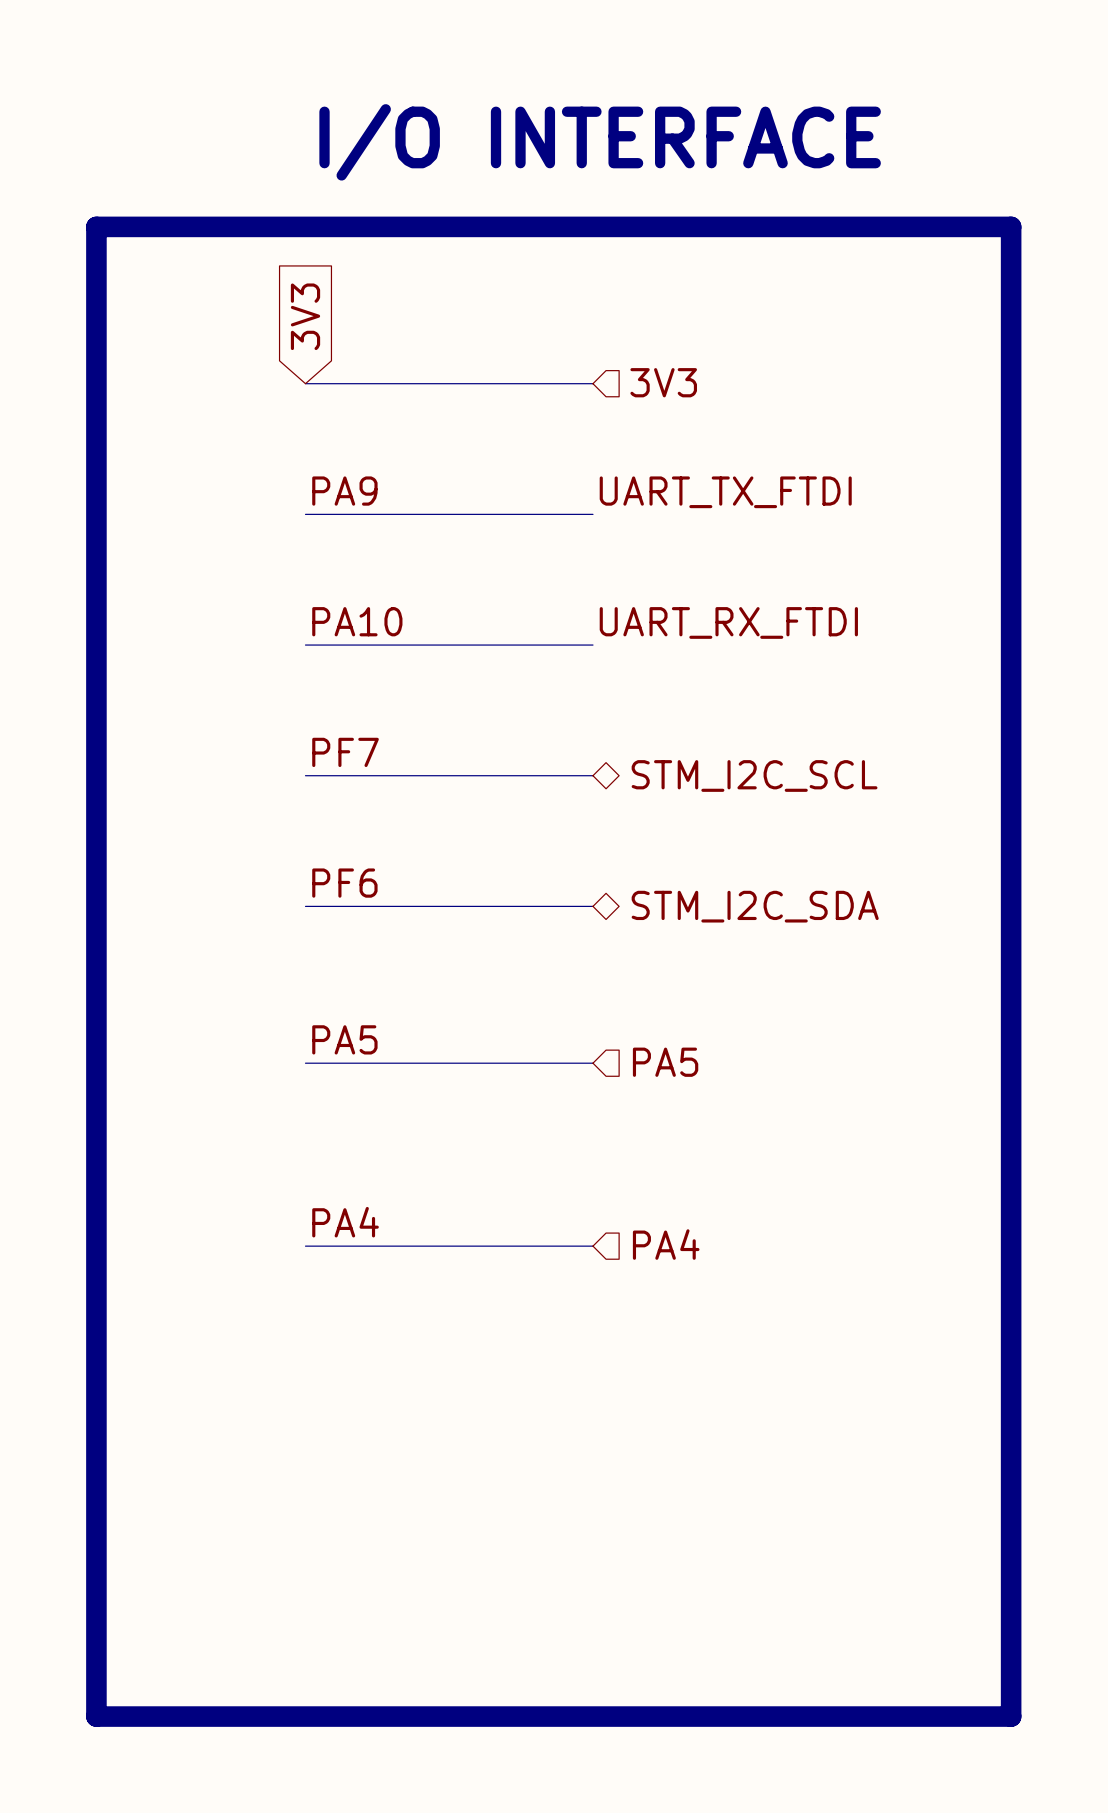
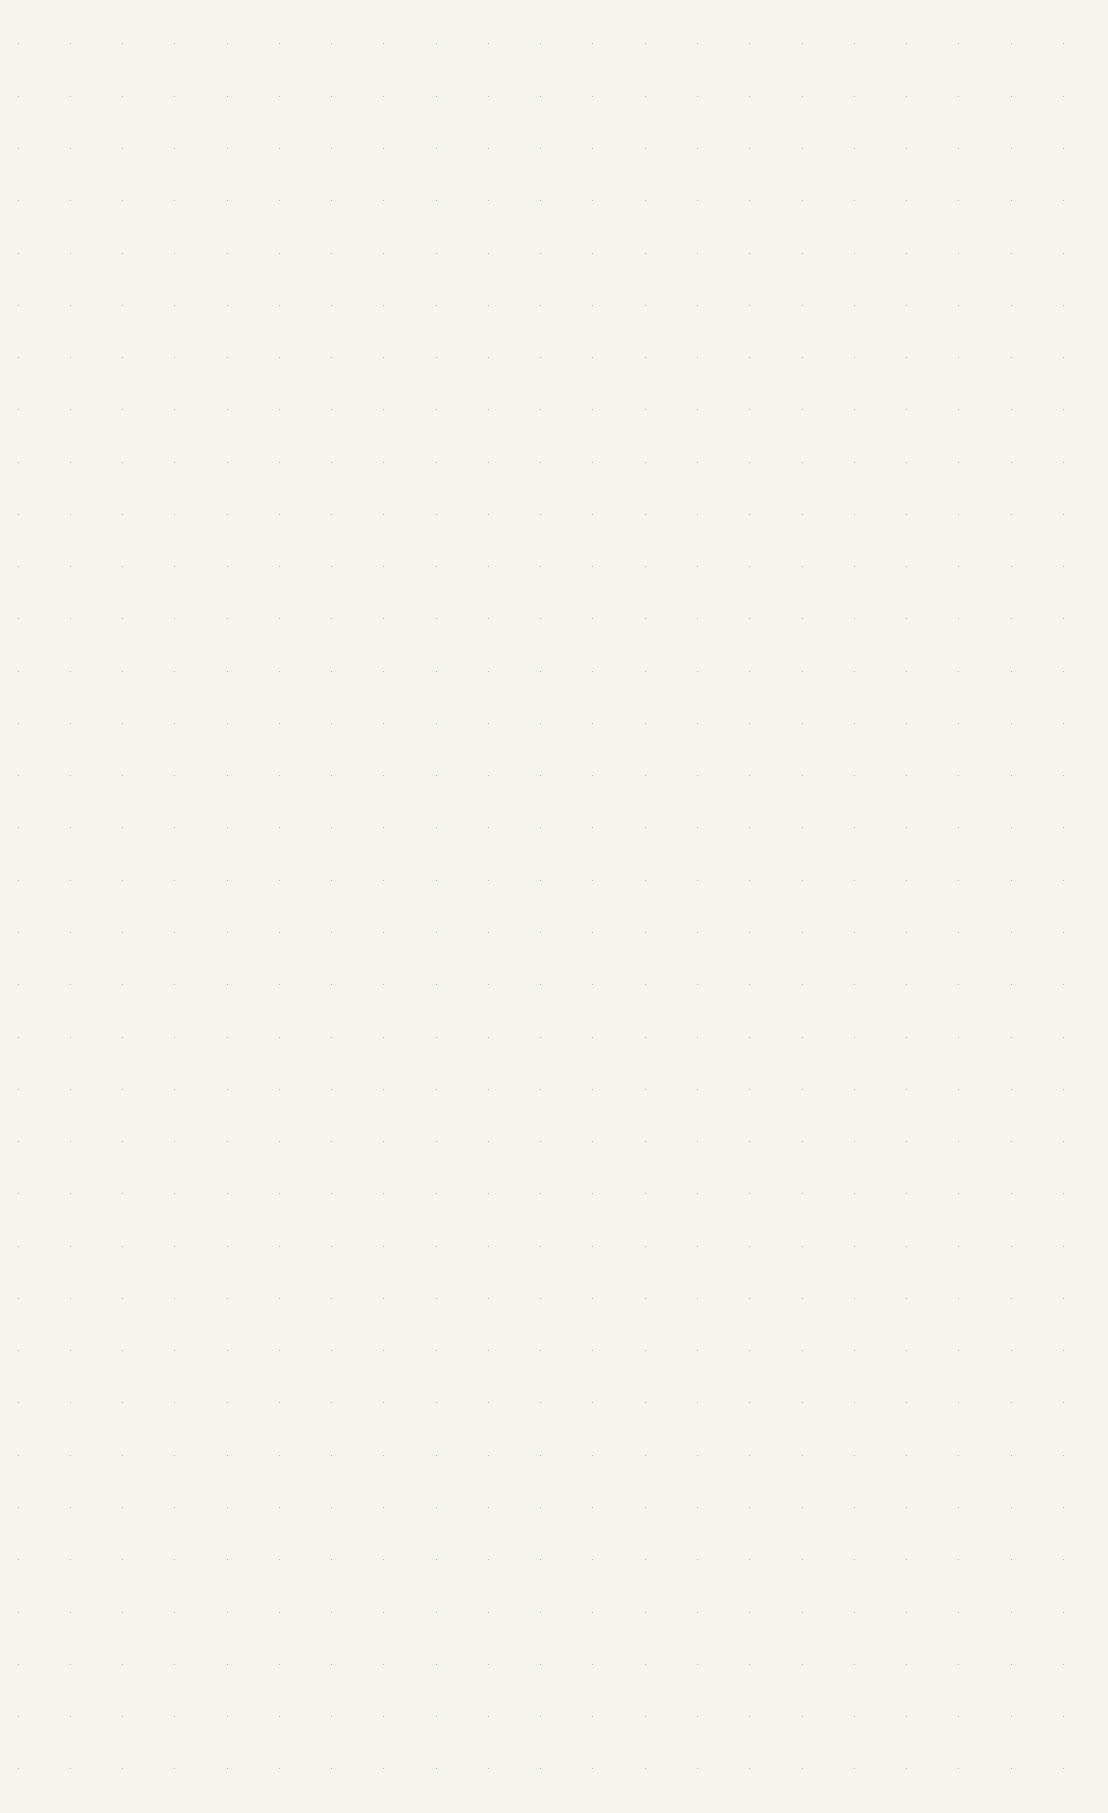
text: I/O INTERFACE (600, 142) -> none
line: (96, 226) (1011, 226) (1011, 1716) (96, 1716) (96, 226) -> none
global label: 3V3 (305, 316) -> none
hierarchical label: 3V3 (663, 382) -> none
wire: (305, 383) (592, 383) -> none
label: PA9 (344, 491) -> none
label: UART_TX_FTDI (725, 492) -> none
wire: (305, 514) (592, 514) -> none
label: PA10 (357, 621) -> none
label: UART_RX_FTDI (728, 622) -> none
wire: (305, 645) (592, 645) -> none
label: PF7 (345, 752) -> none
wire: (305, 775) (592, 775) -> none
hierarchical label: STM_I2C_SCL (754, 775) -> none
label: PF6 (344, 883) -> none
wire: (305, 906) (592, 906) -> none
hierarchical label: STM_I2C_SDA (755, 906) -> none
label: PA5 (344, 1039) -> none
hierarchical label: PA5 (665, 1062) -> none
wire: (305, 1063) (592, 1063) -> none
label: PA4 (345, 1222) -> none
hierarchical label: PA4 (666, 1244) -> none
wire: (305, 1246) (592, 1246) -> none

